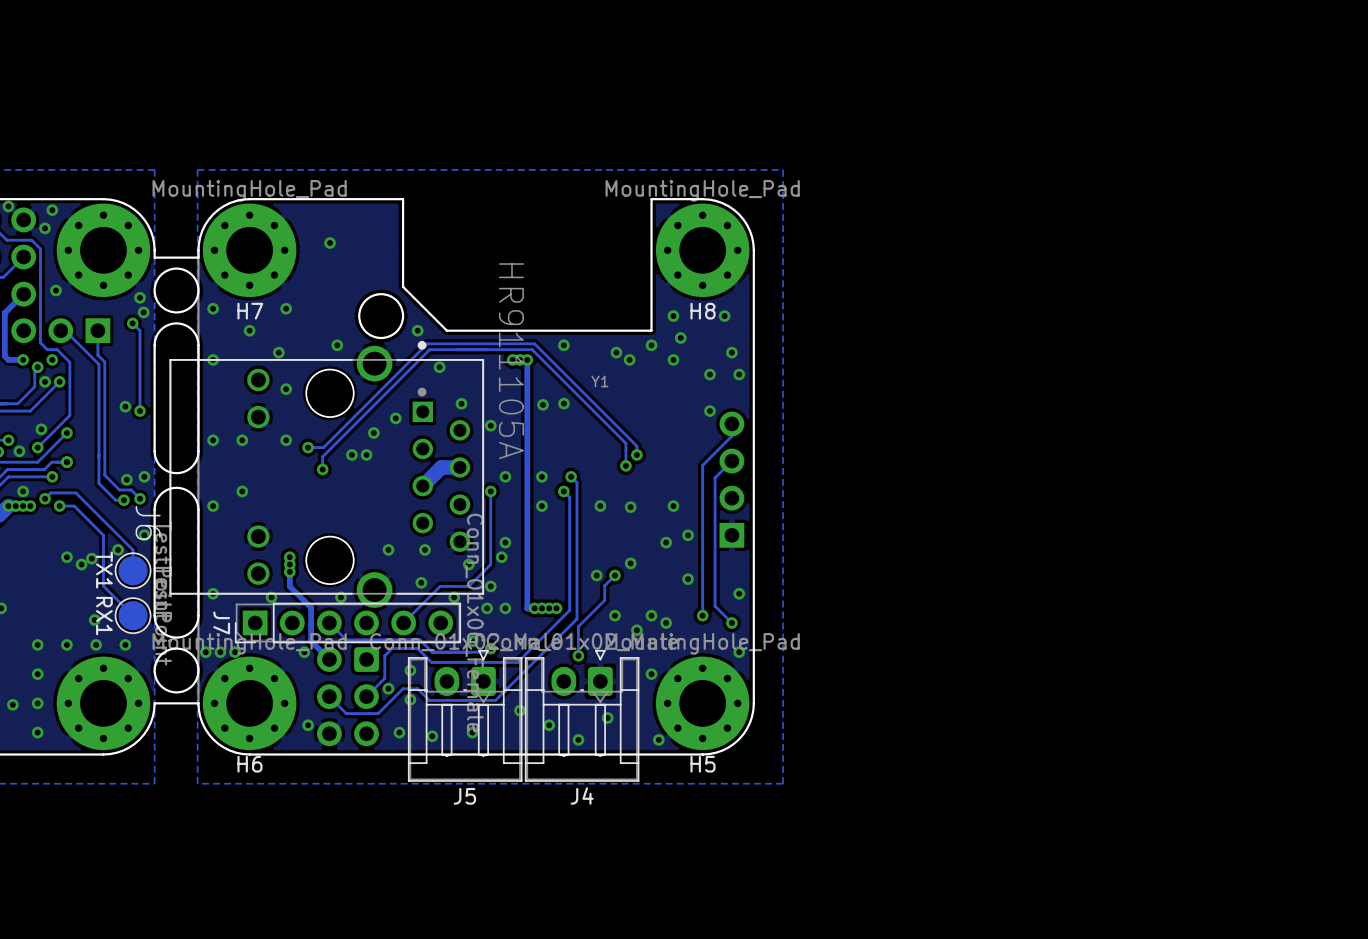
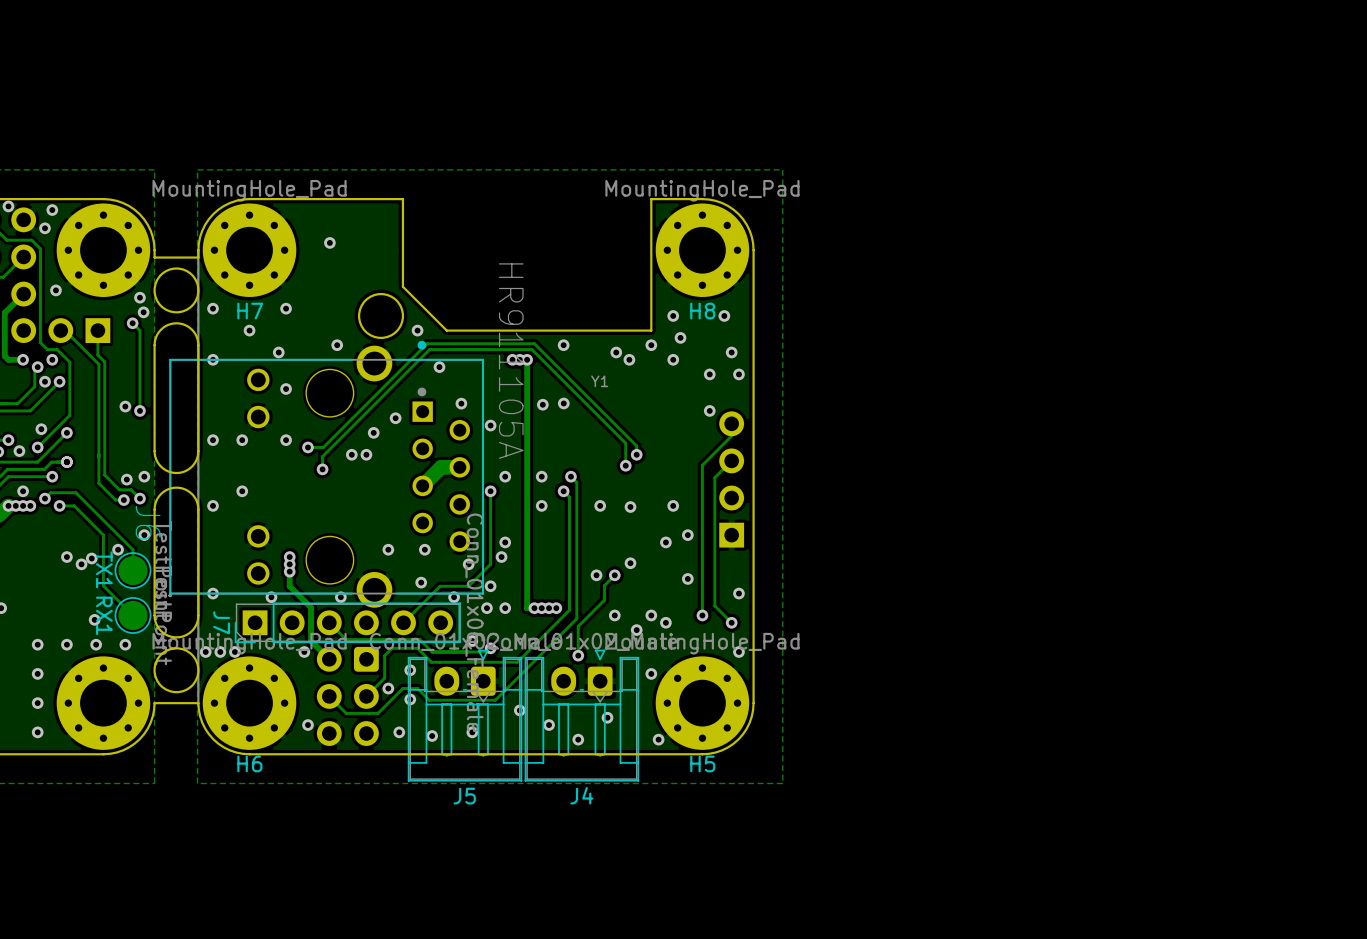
via: (12, 704) -> none

